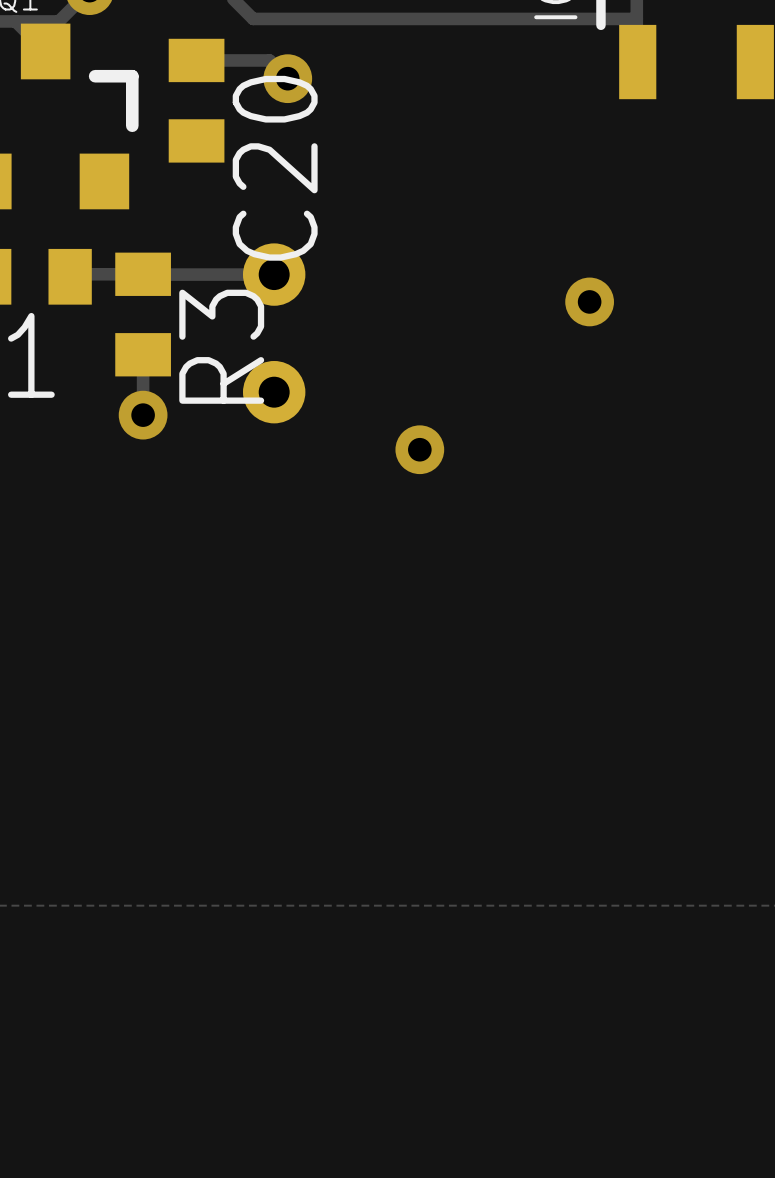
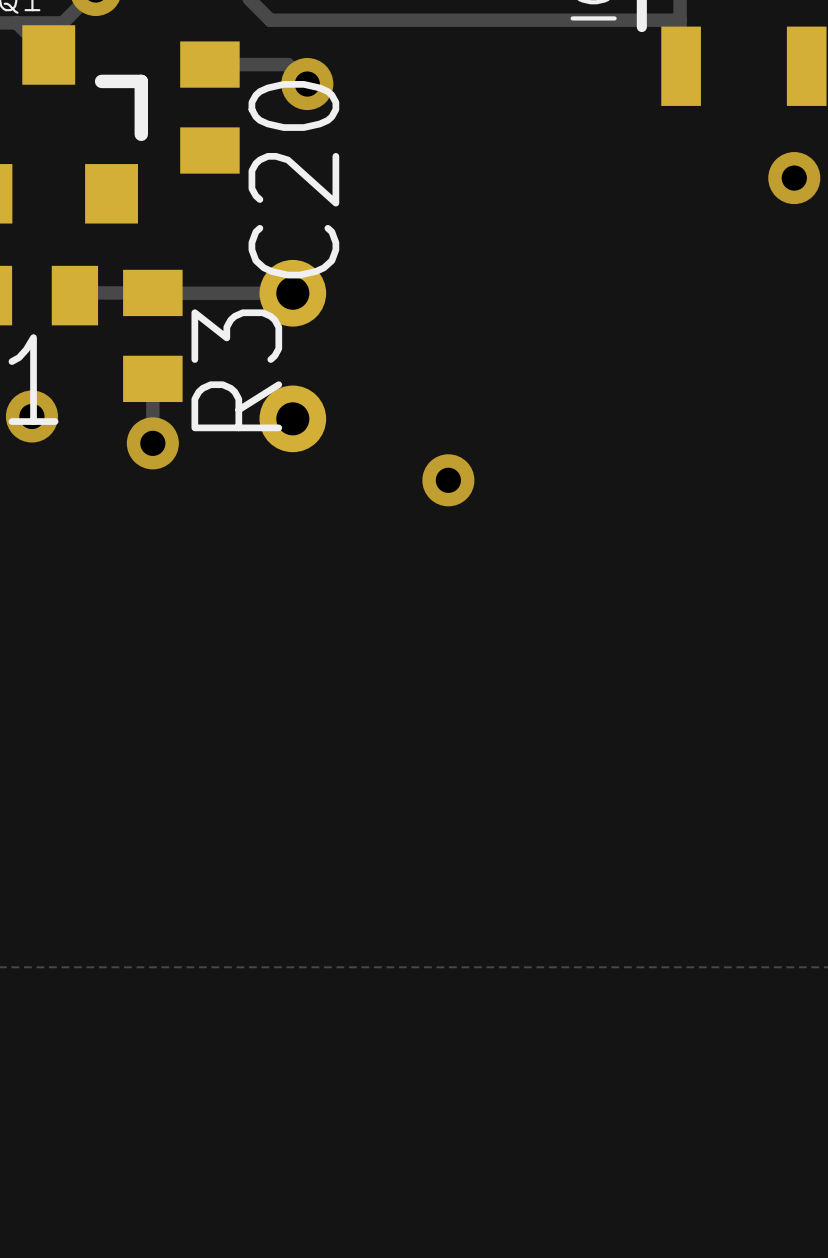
via position: (589, 301) -> (794, 178)
via: none -> (31, 416)

